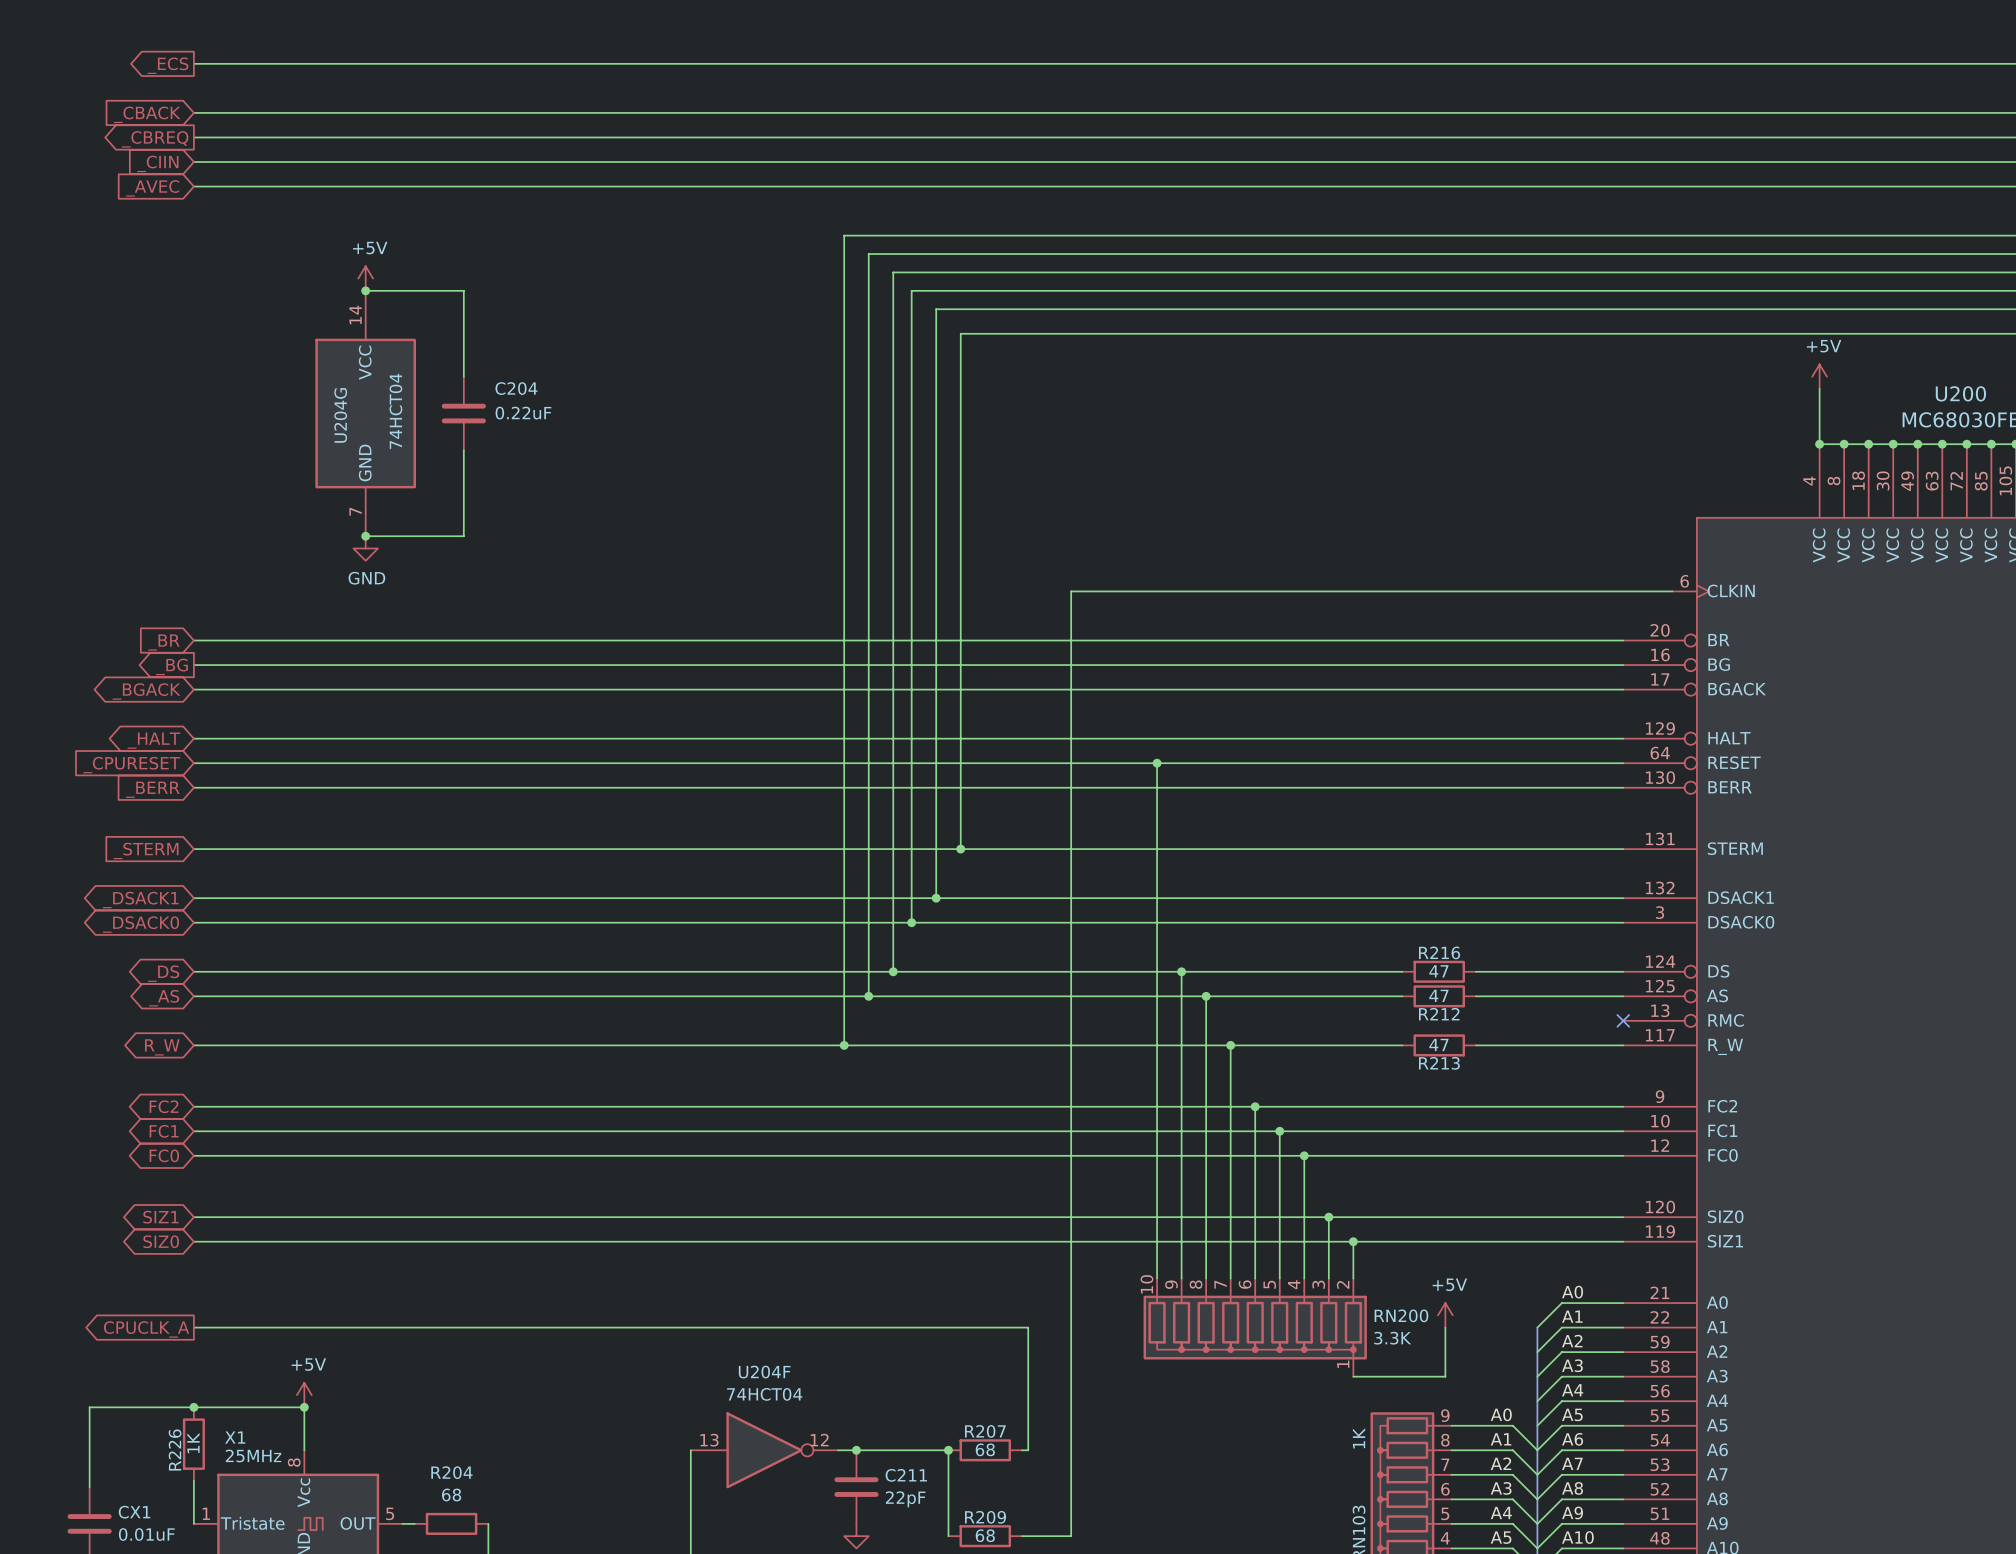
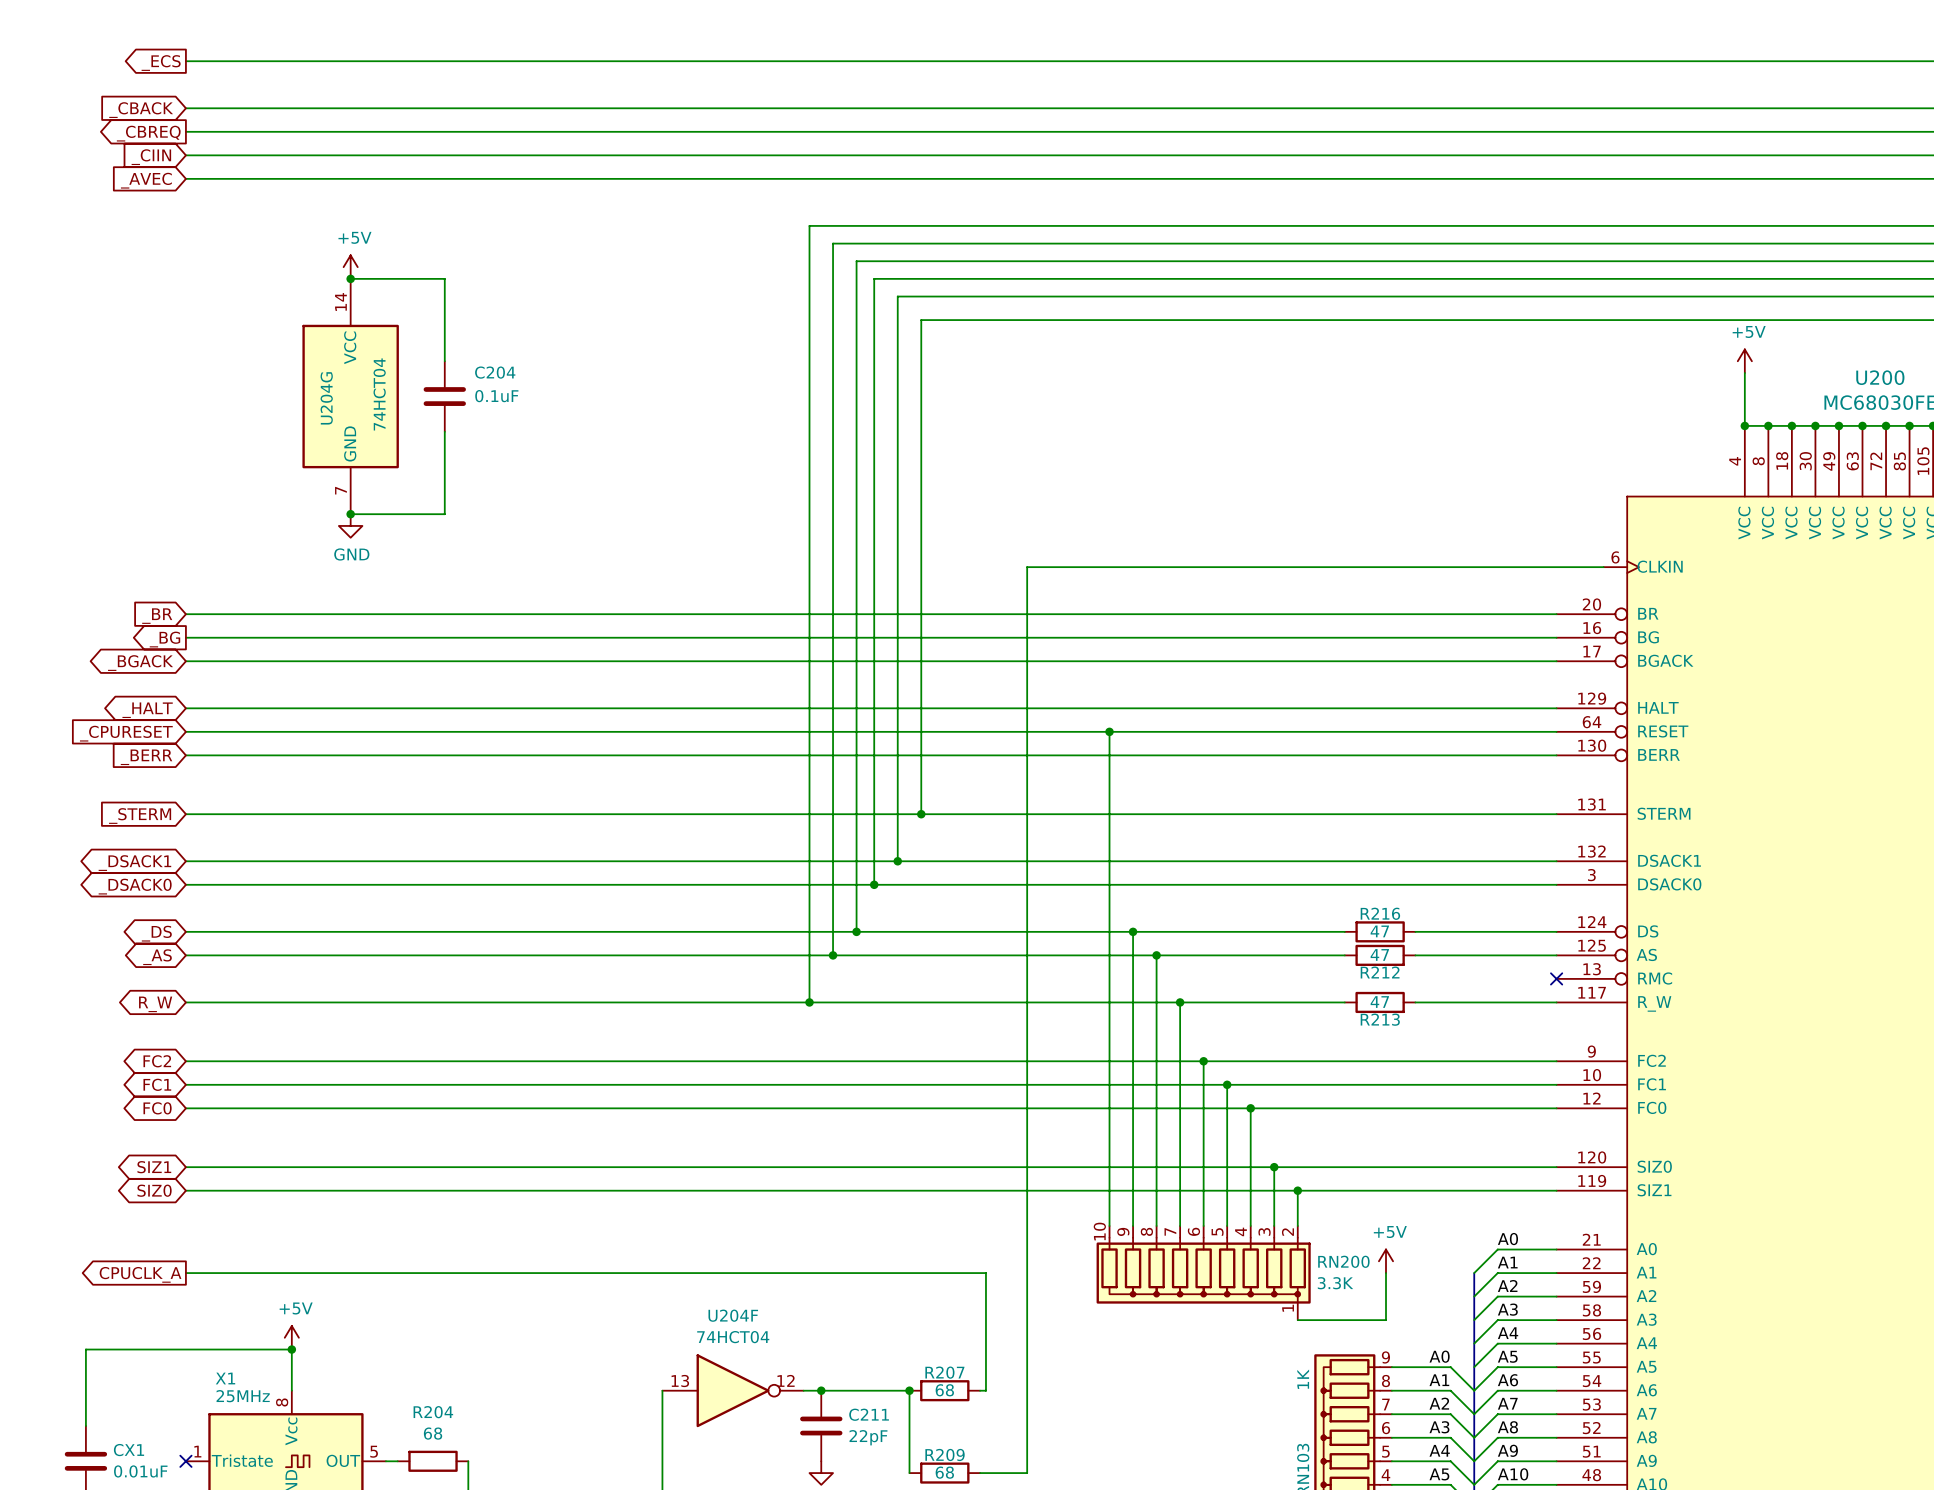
C204 value: 0.22uF (523, 413) -> 0.1uF (496, 396)
junction: (193, 1407) -> none
R226: 1K (193, 1444) -> none
wire: (193, 1480) (193, 1523) -> none
no-connect mark: none -> (185, 1461)

